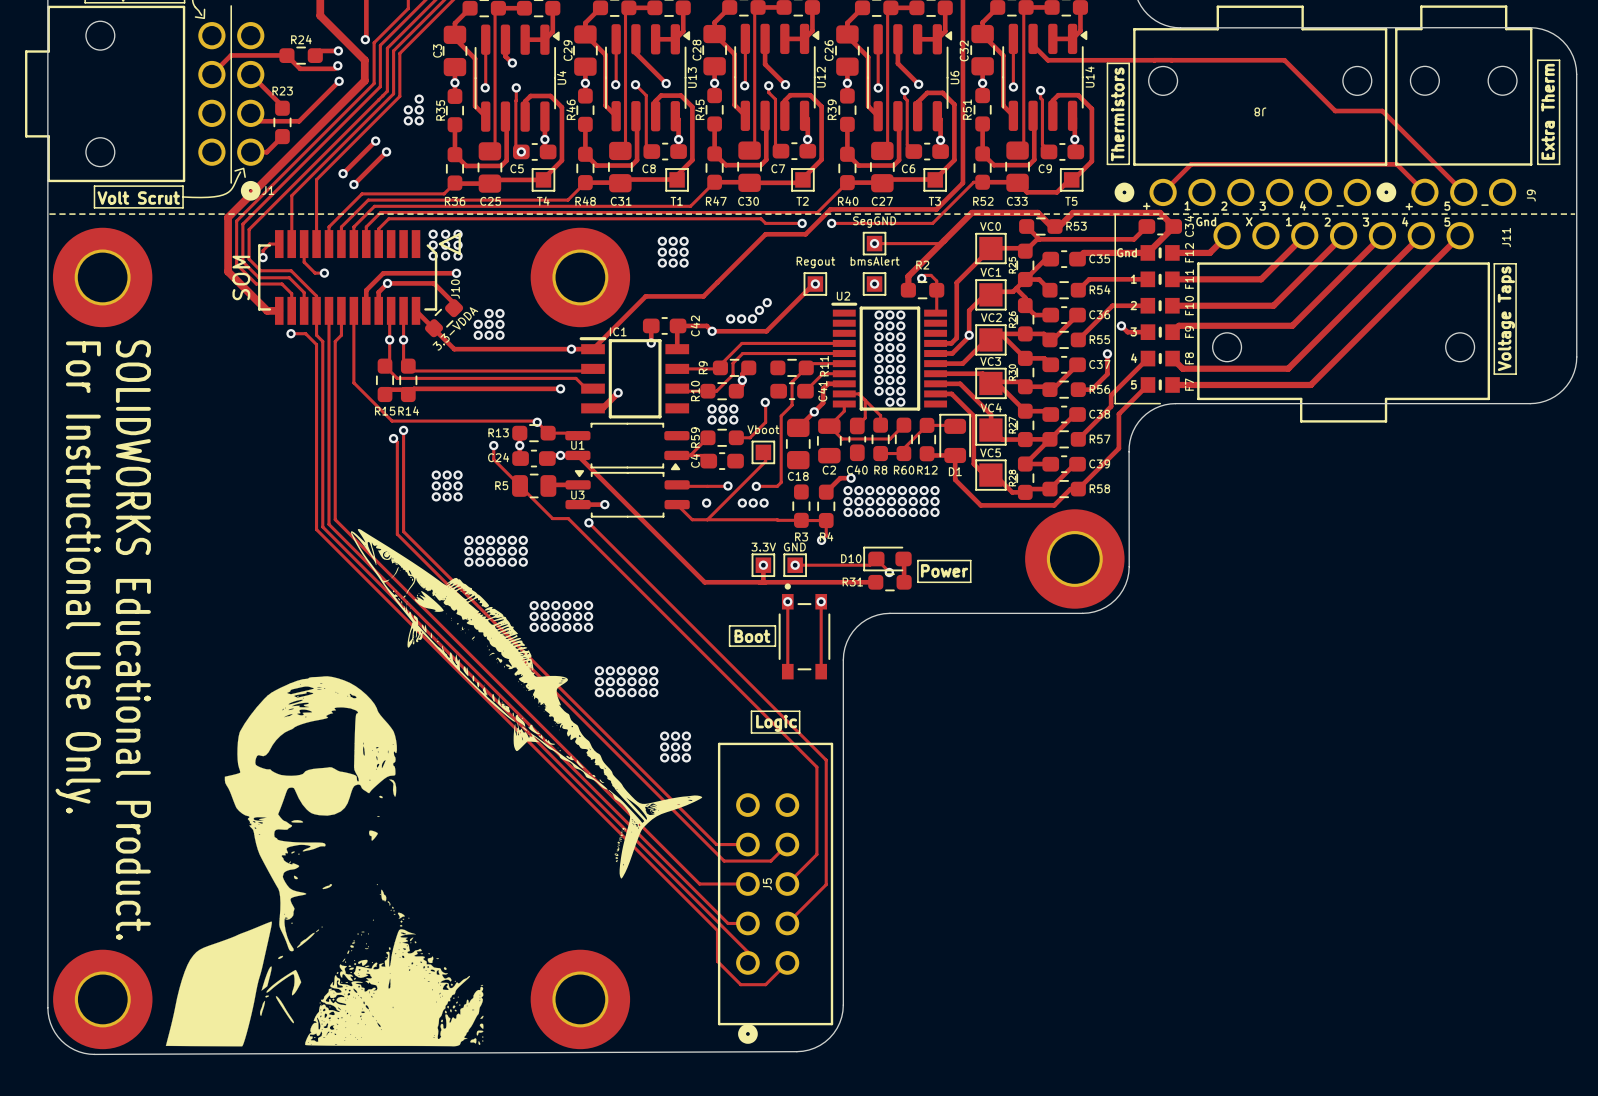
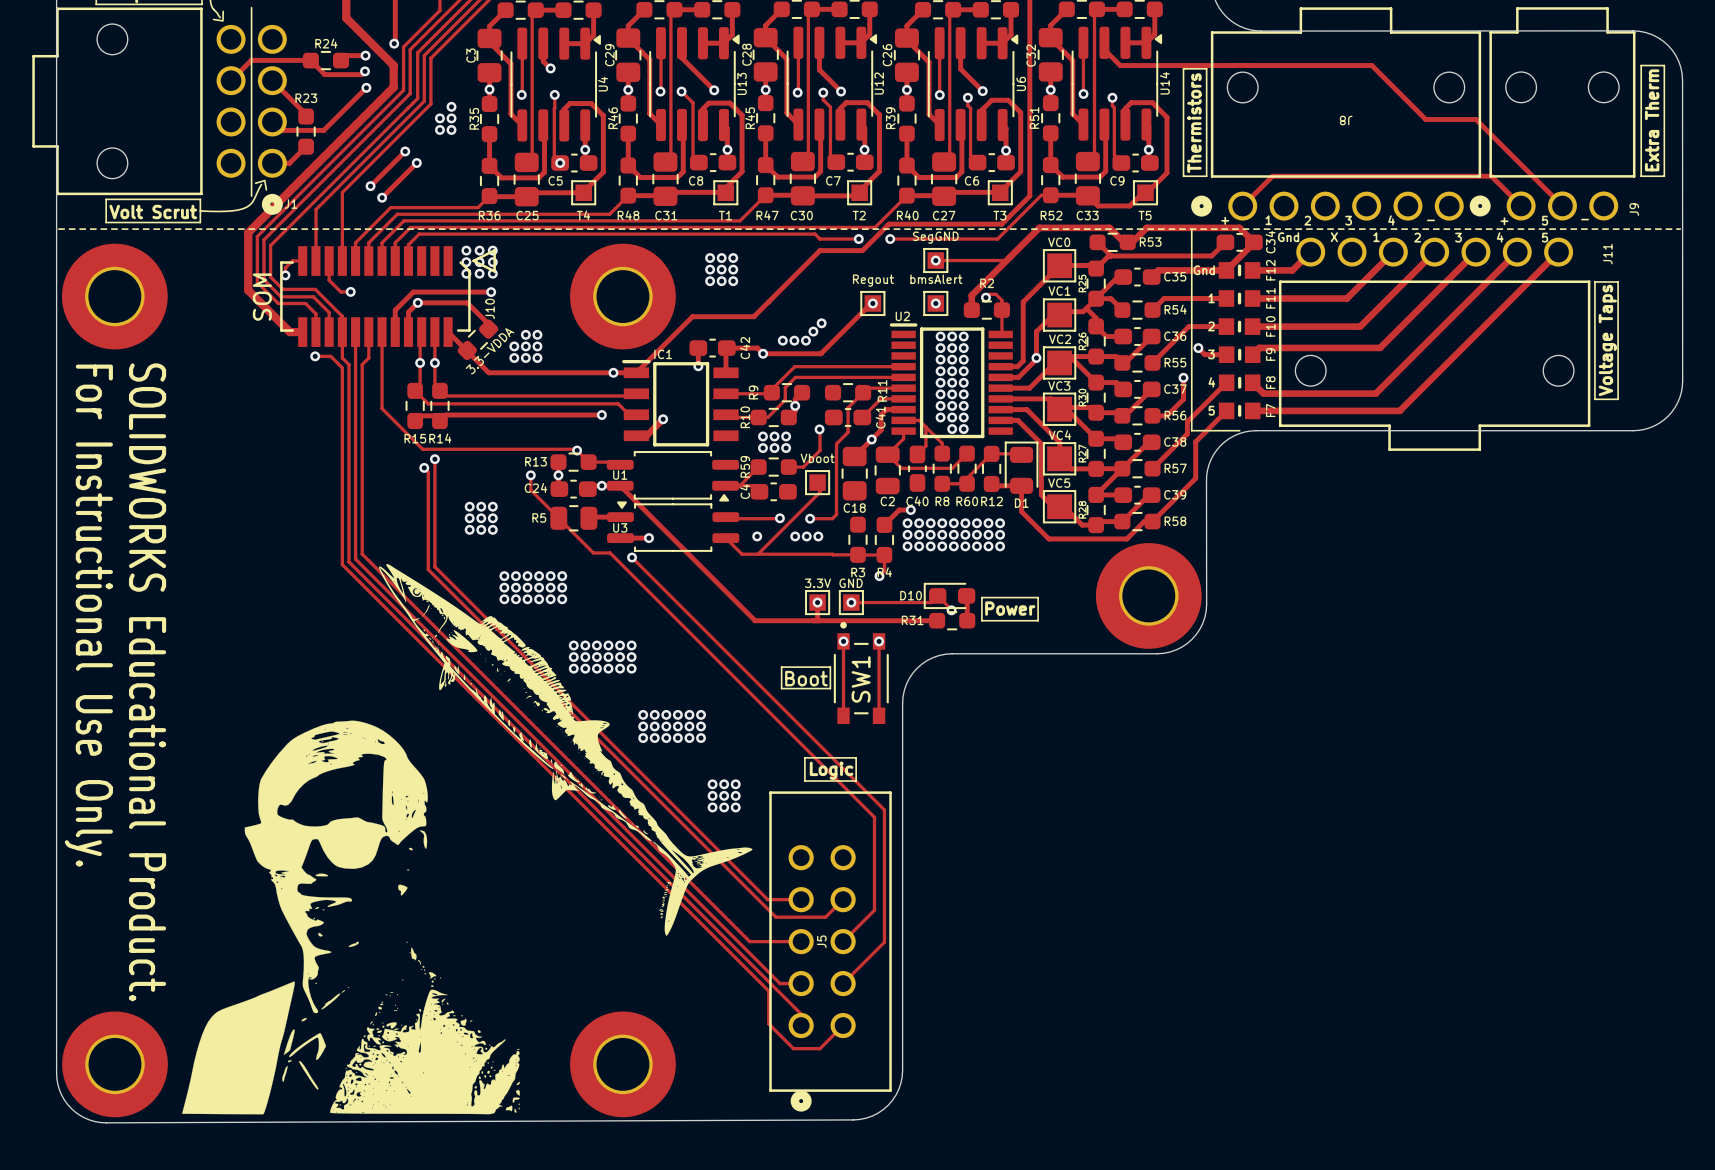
Boot name: Boot (752, 636) -> SW1 (861, 679)
text: none -> Boot (806, 678)

